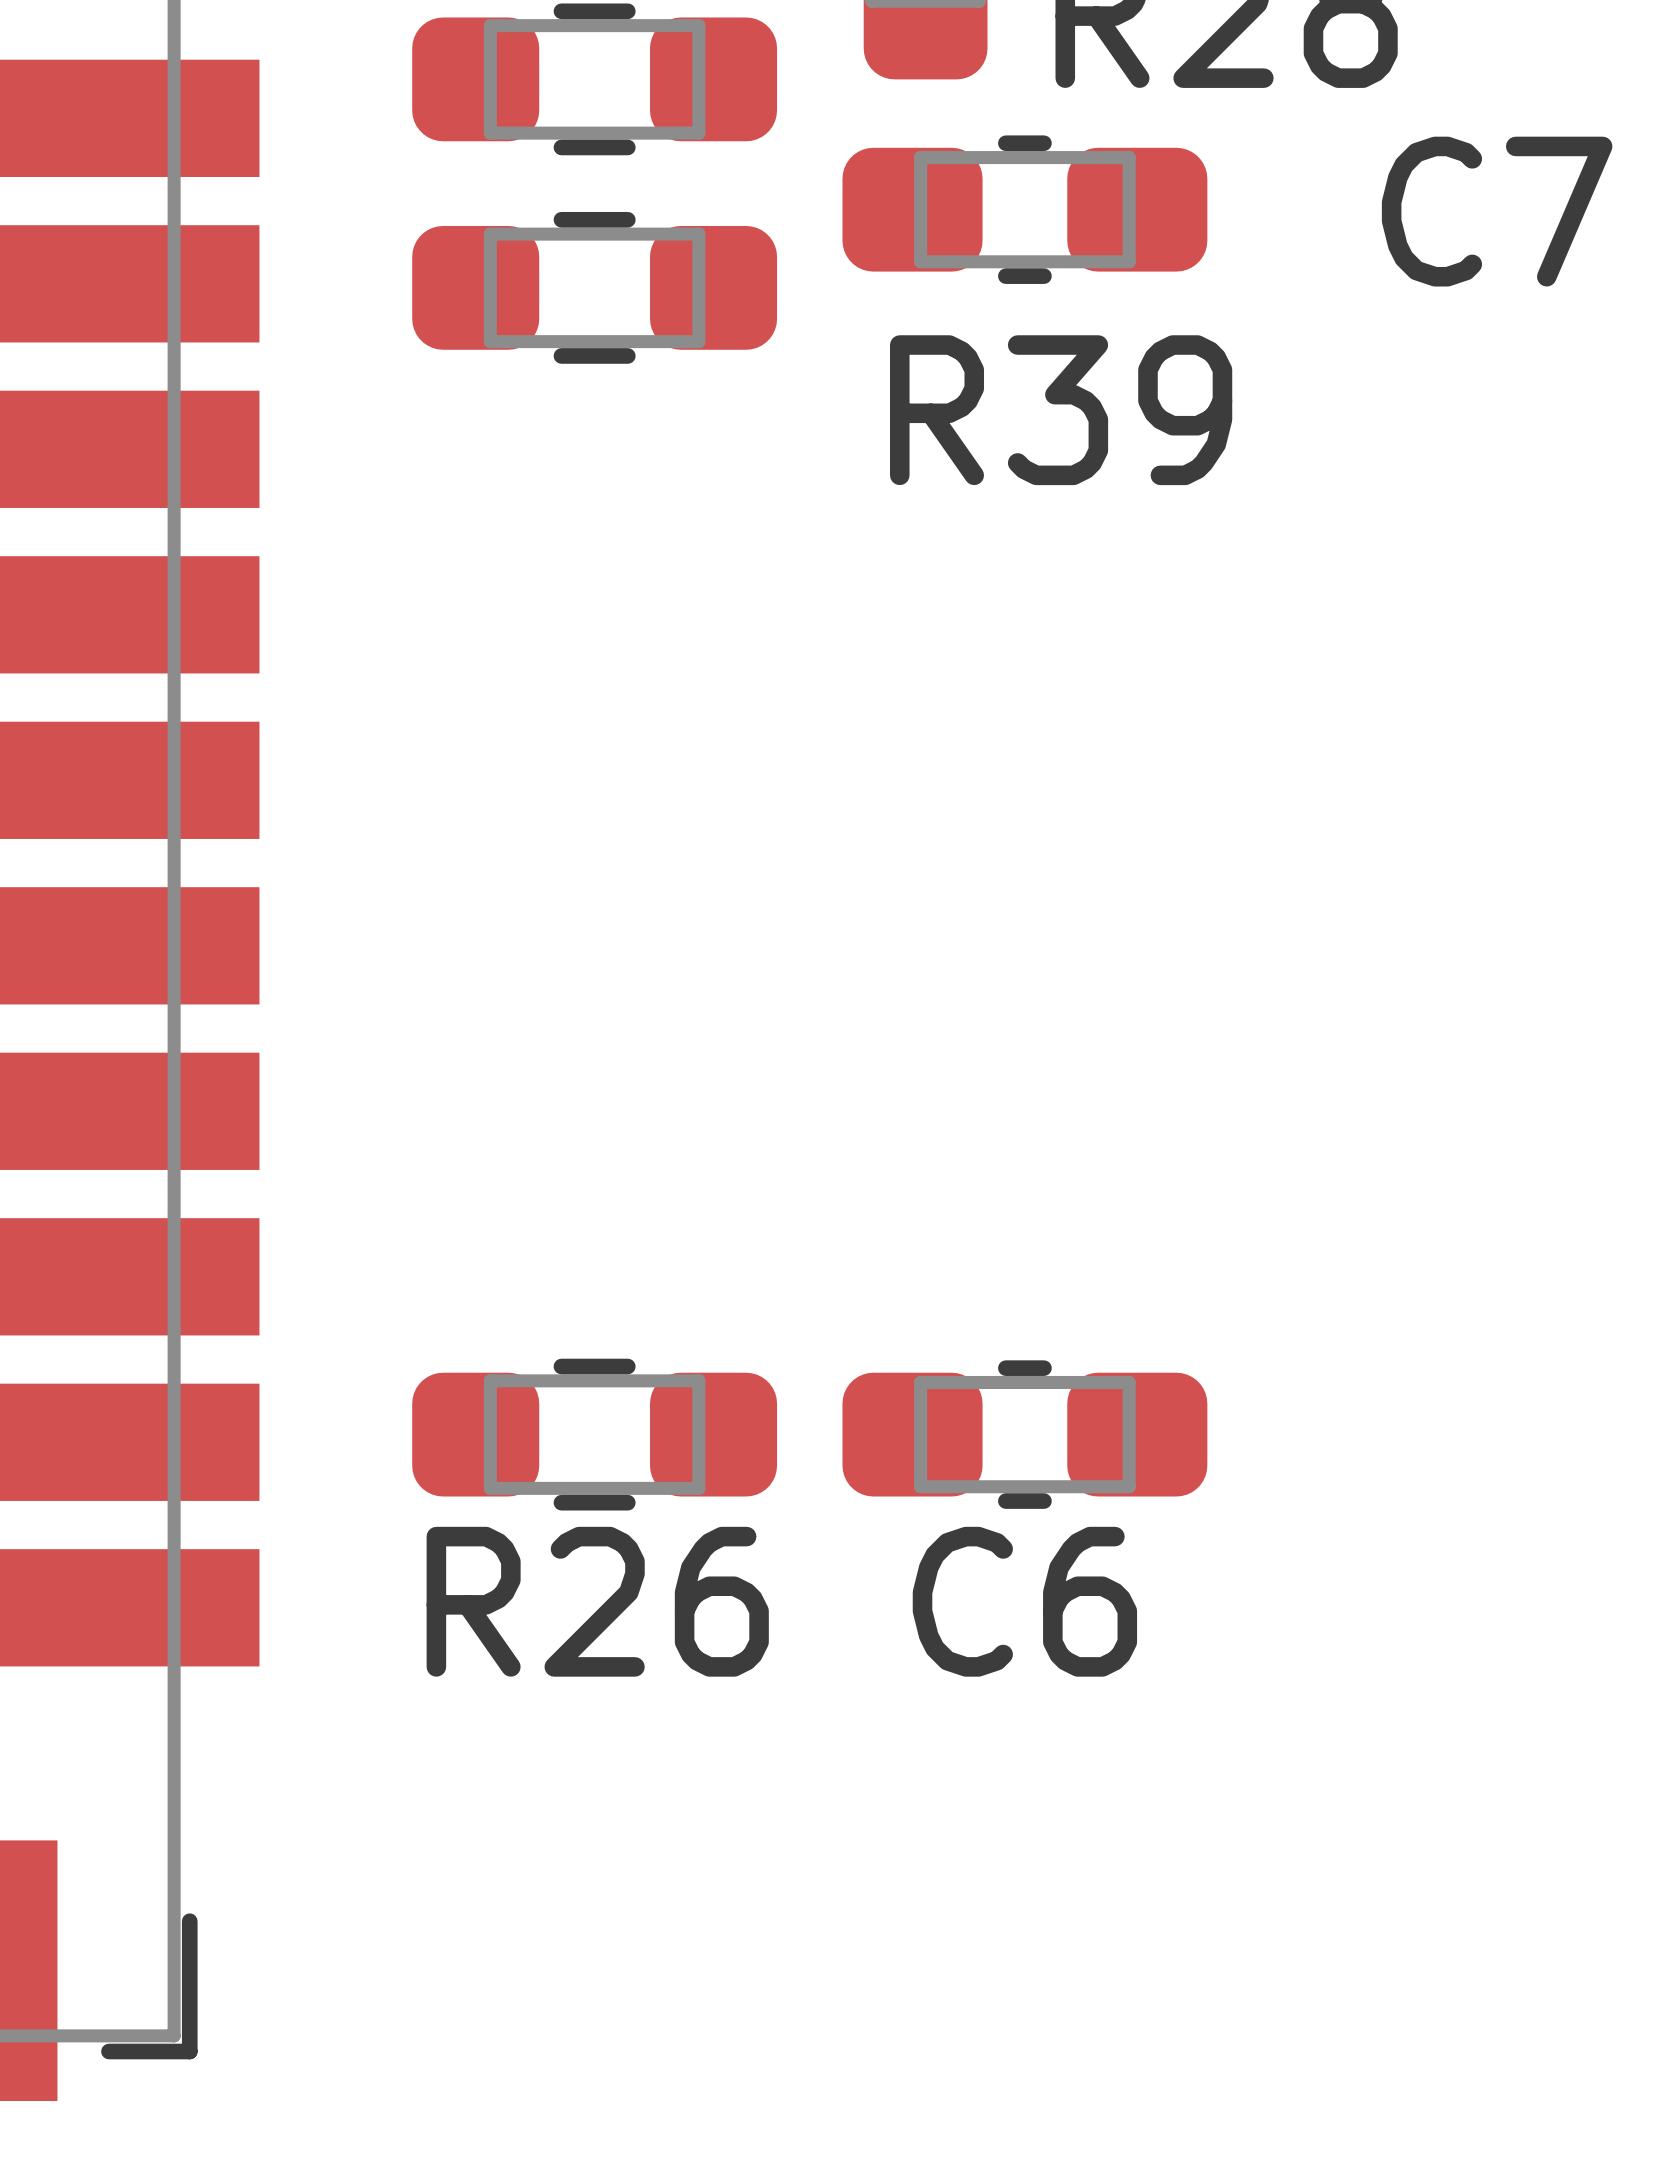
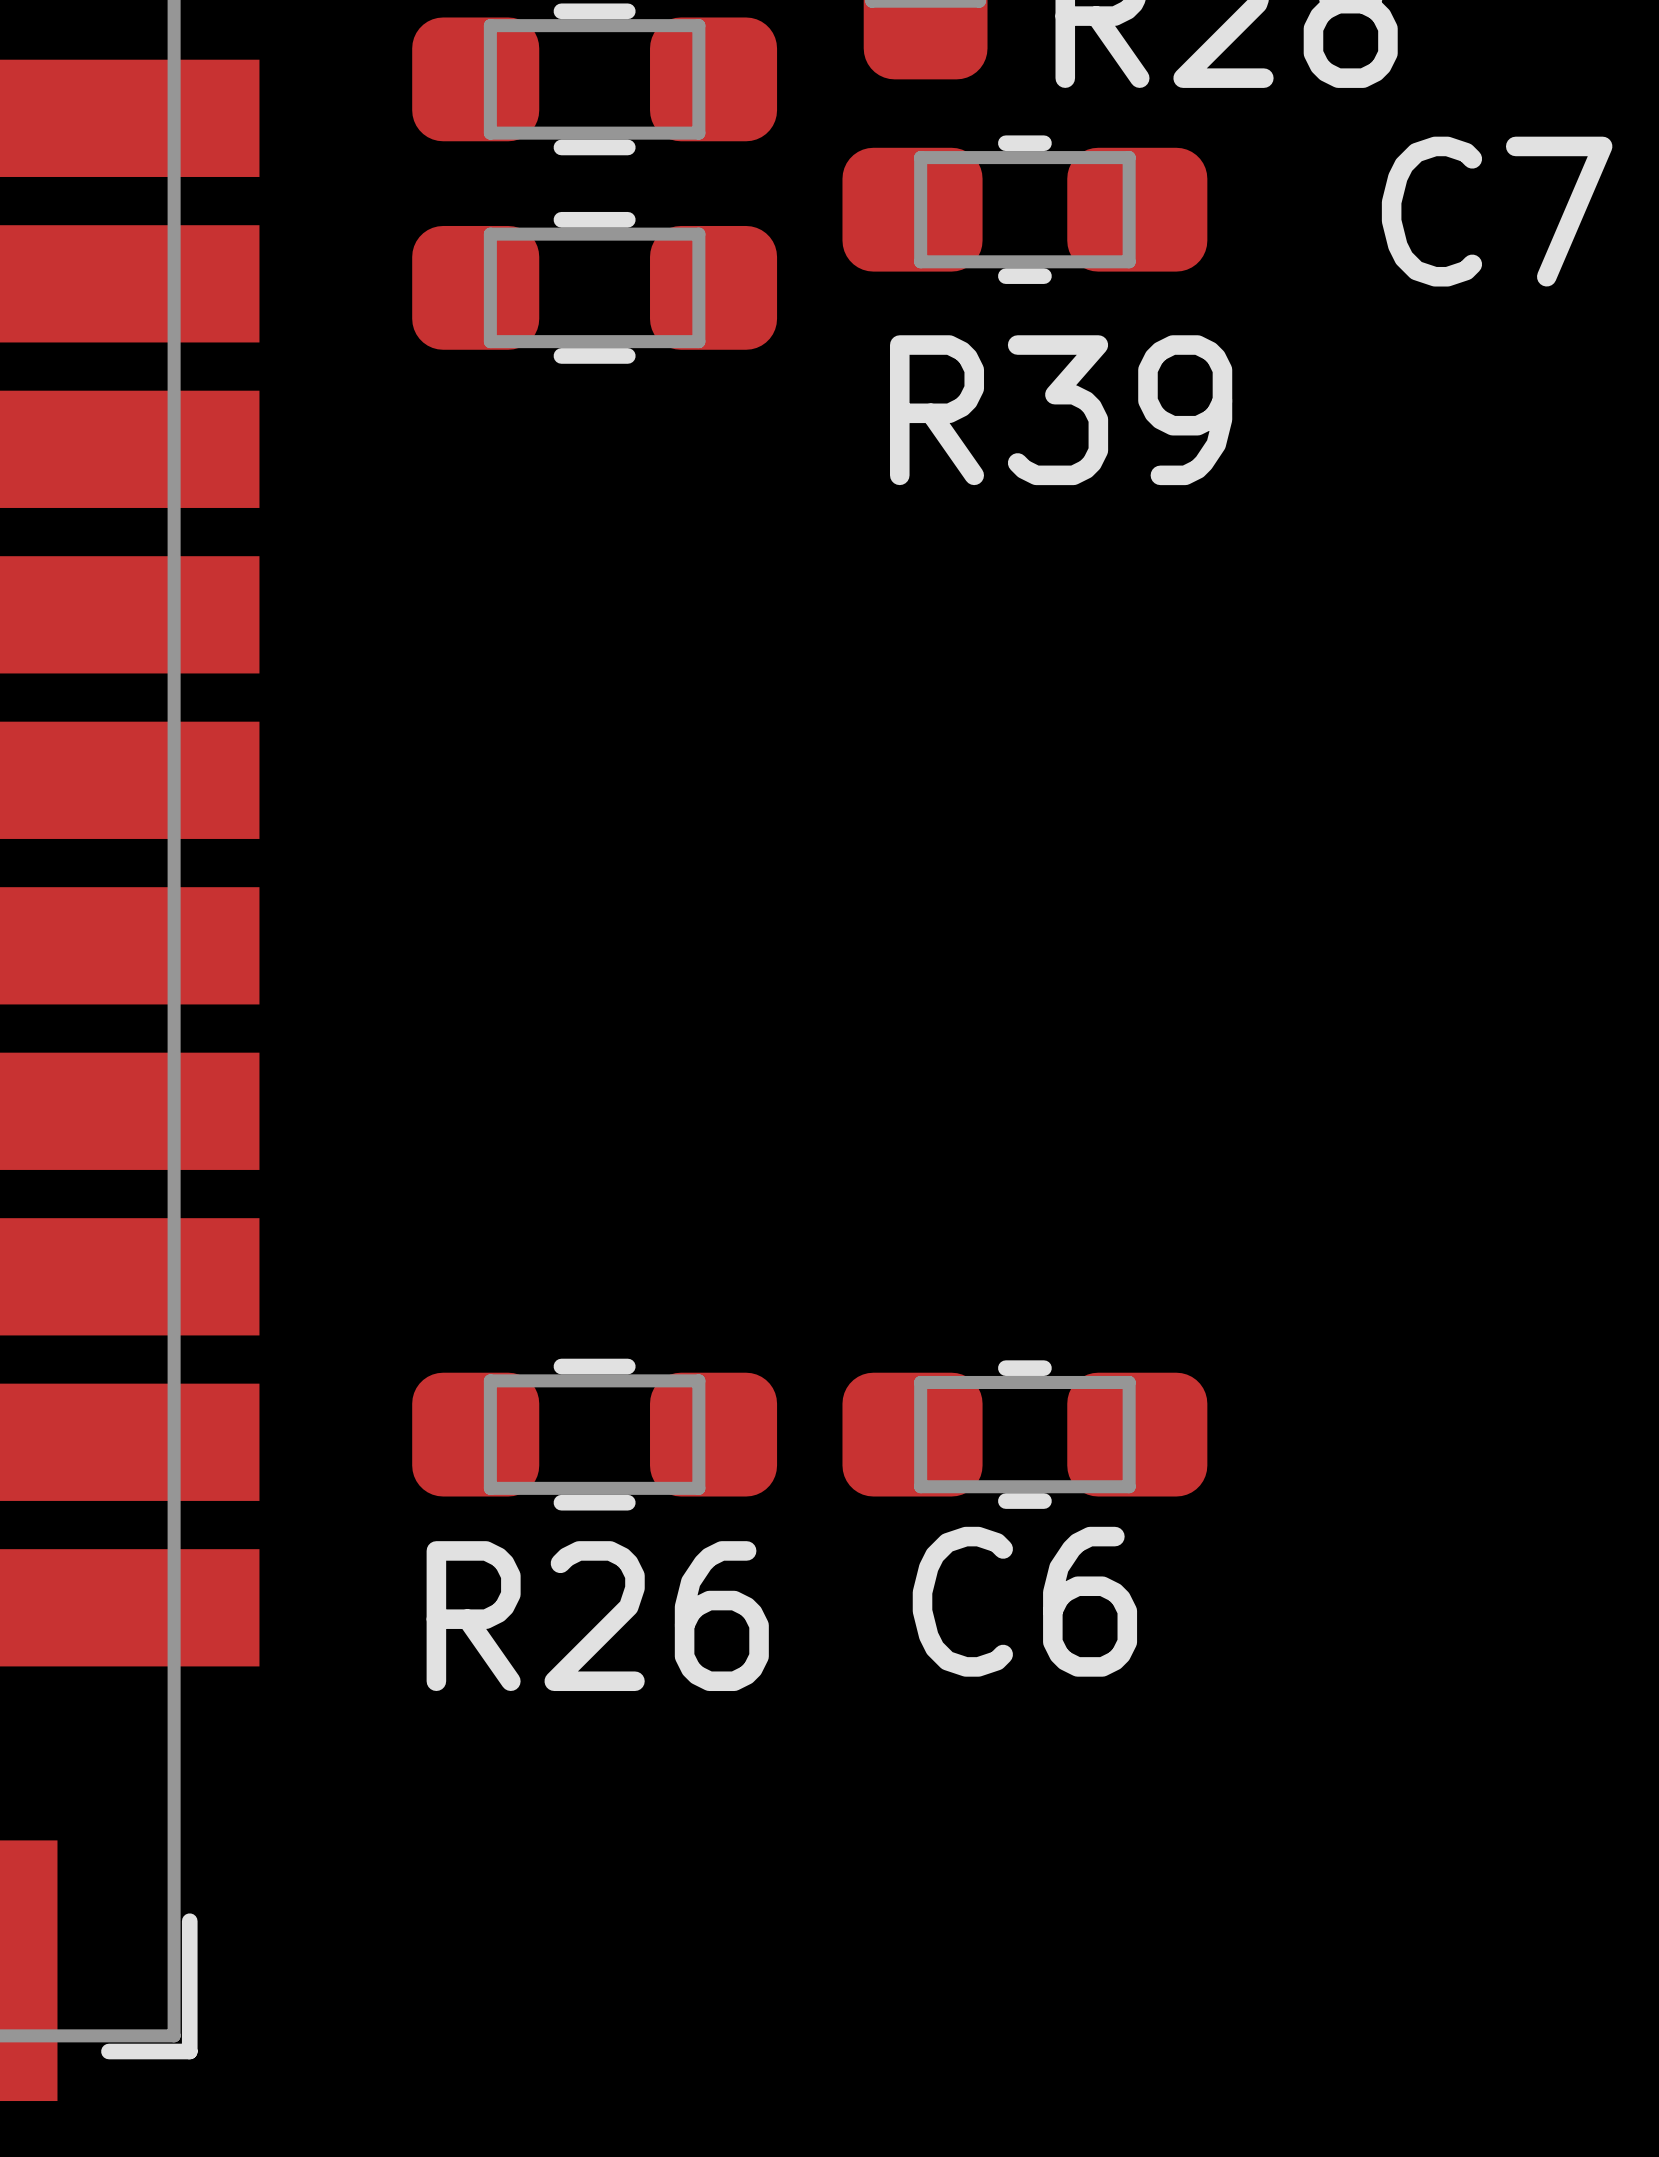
R26 name position: R26 (597, 1601) -> R26 (597, 1616)

